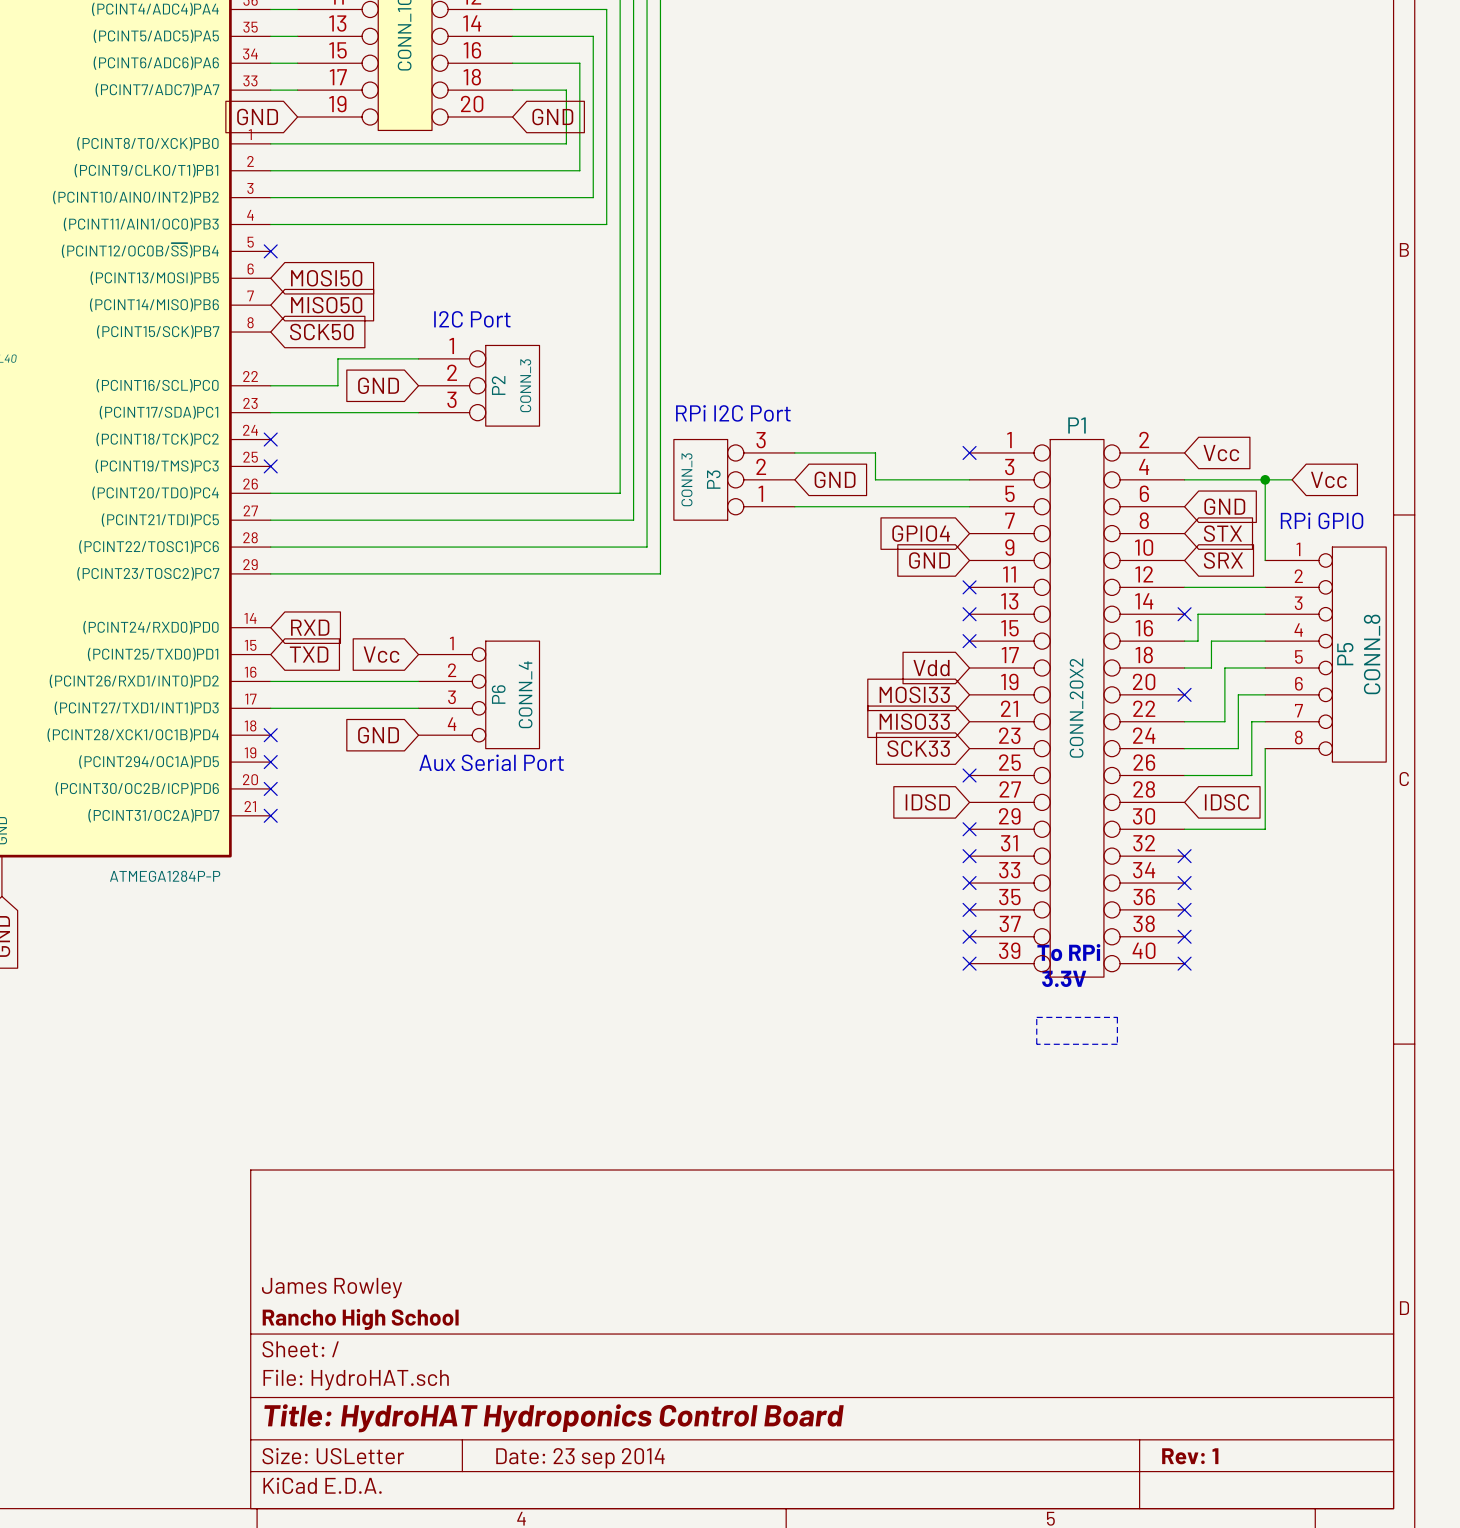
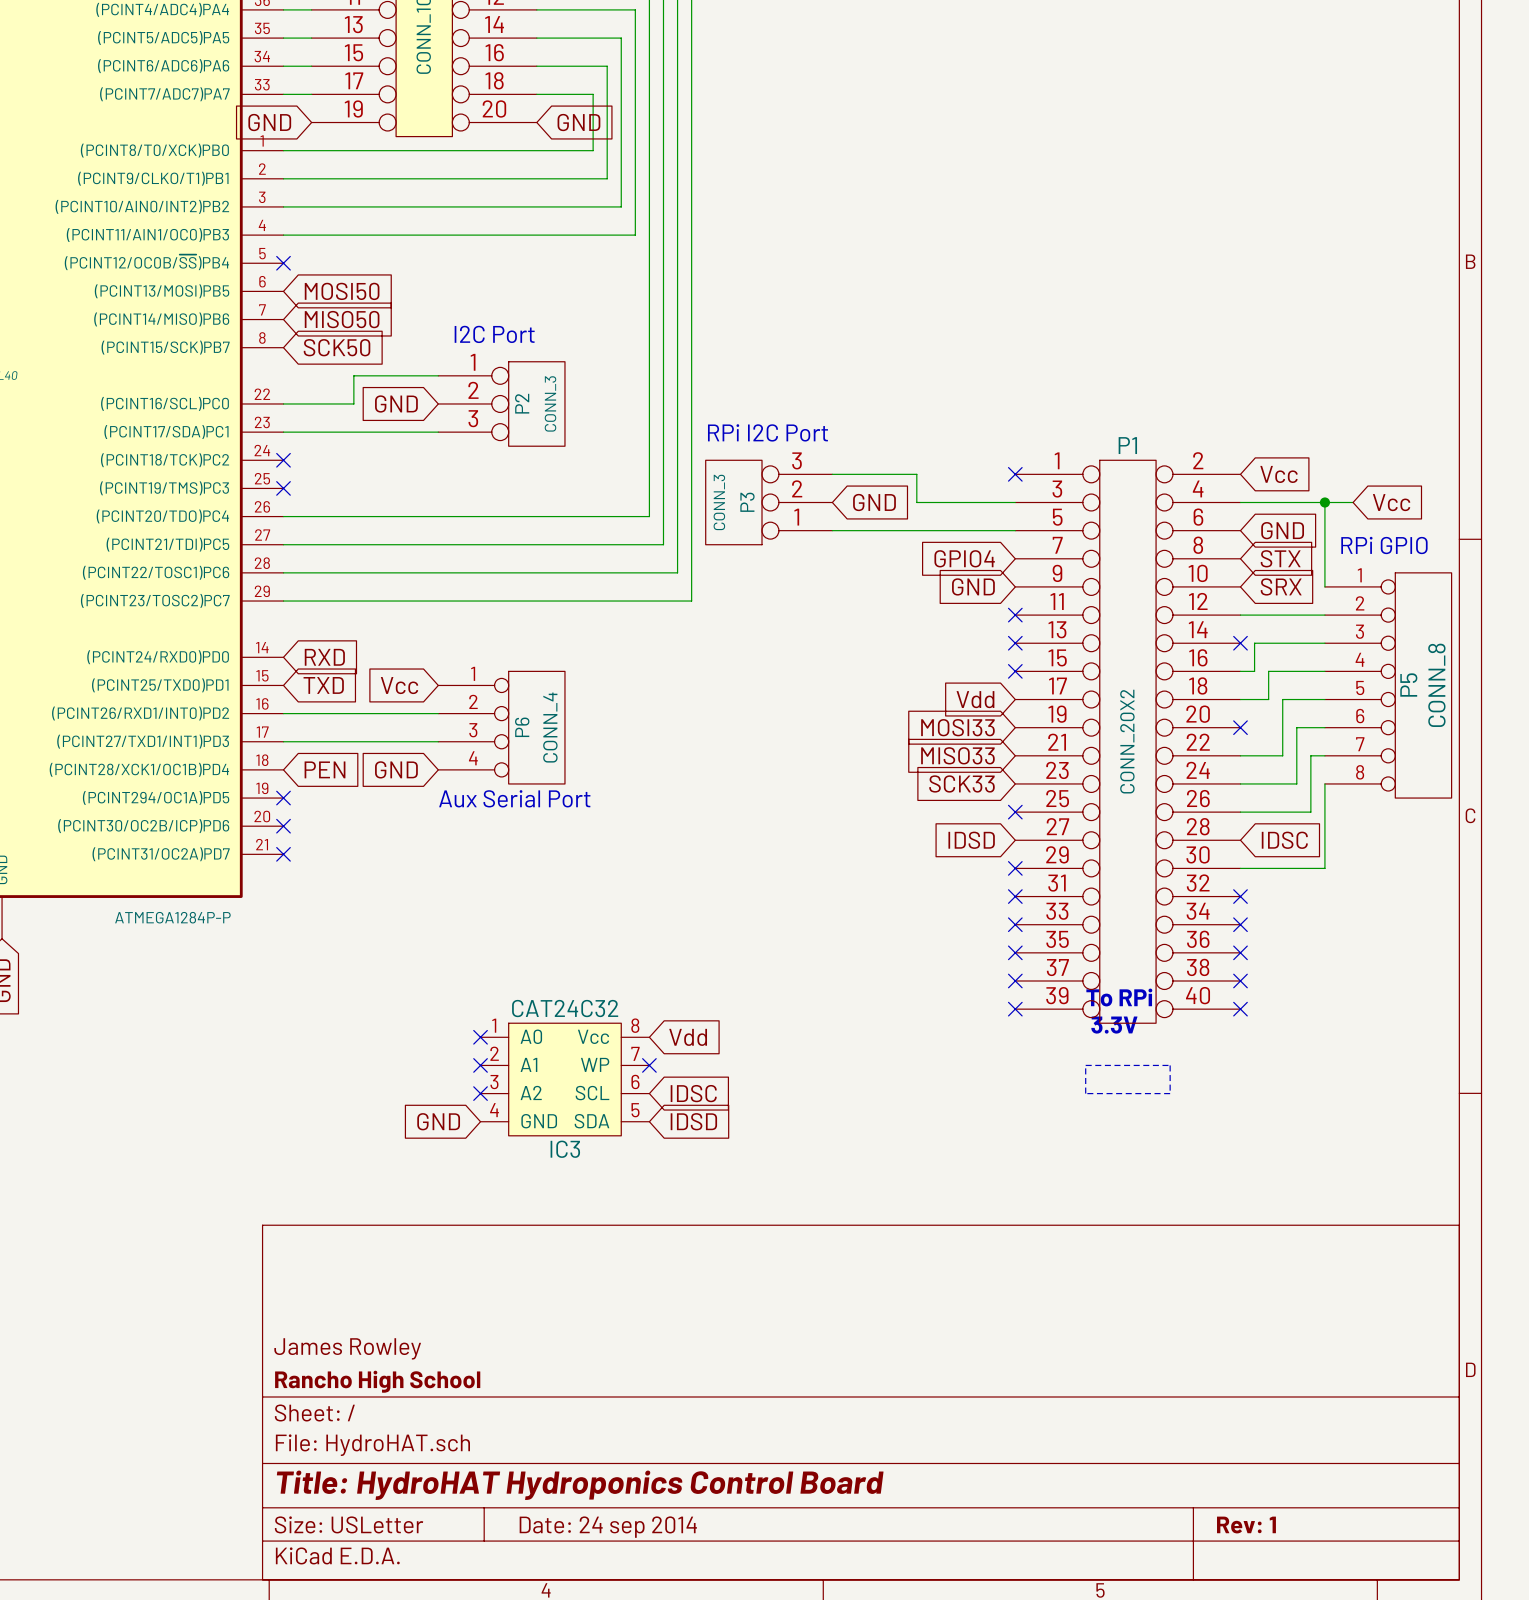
no-connect mark: (270, 735) -> none
global label: none -> PEN (325, 769)
no-connect mark: none -> (480, 1037)
global label: none -> Vdd (688, 1037)
no-connect mark: none -> (480, 1065)
no-connect mark: none -> (649, 1065)
IC3: none -> CAT24C32 (564, 1079)
no-connect mark: none -> (480, 1093)
global label: none -> IDSC (693, 1093)
global label: none -> GND (438, 1121)
global label: none -> IDSD (693, 1121)
title block: Date: 23 sep 2014 (580, 1458) -> Date: 24 sep 2014 (608, 1527)

